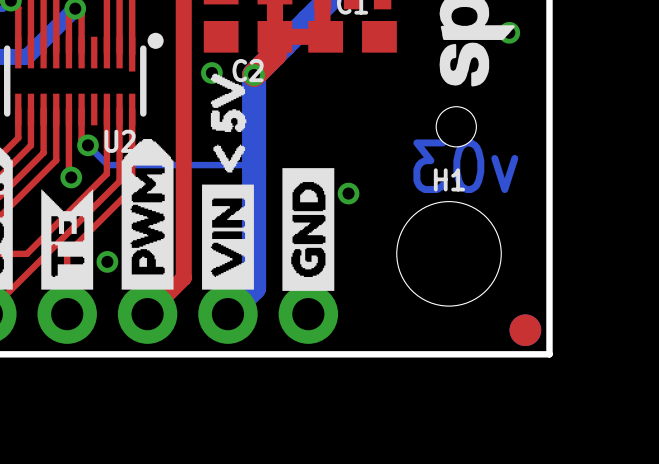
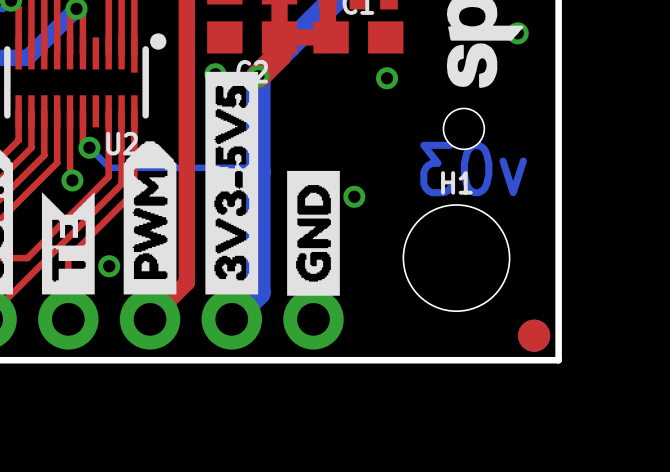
drawing: none -> [205, 71, 259, 295]
drawing: [202, 73, 254, 290] -> none
via: none -> (387, 78)

